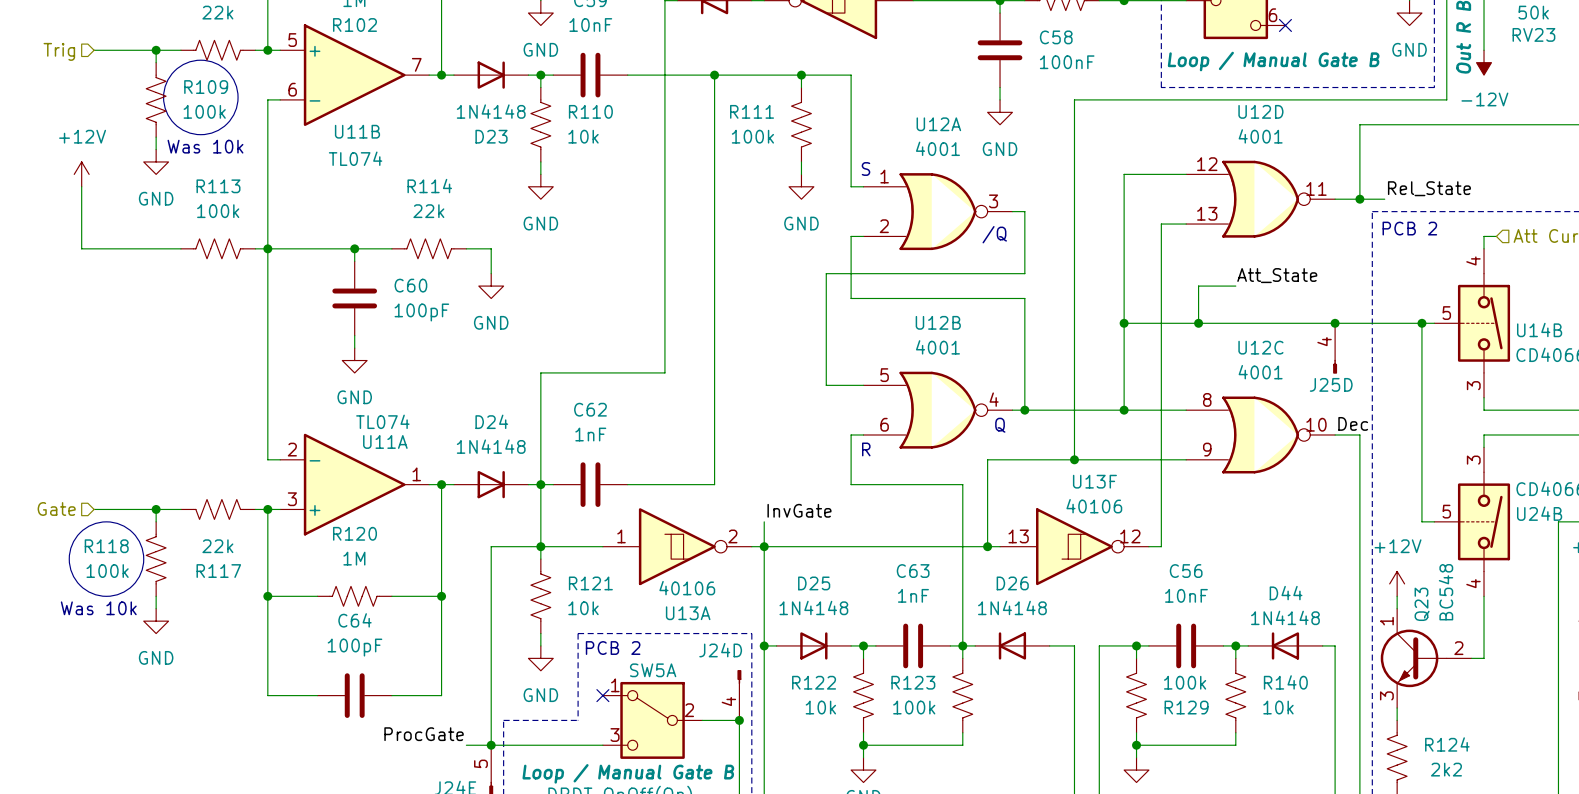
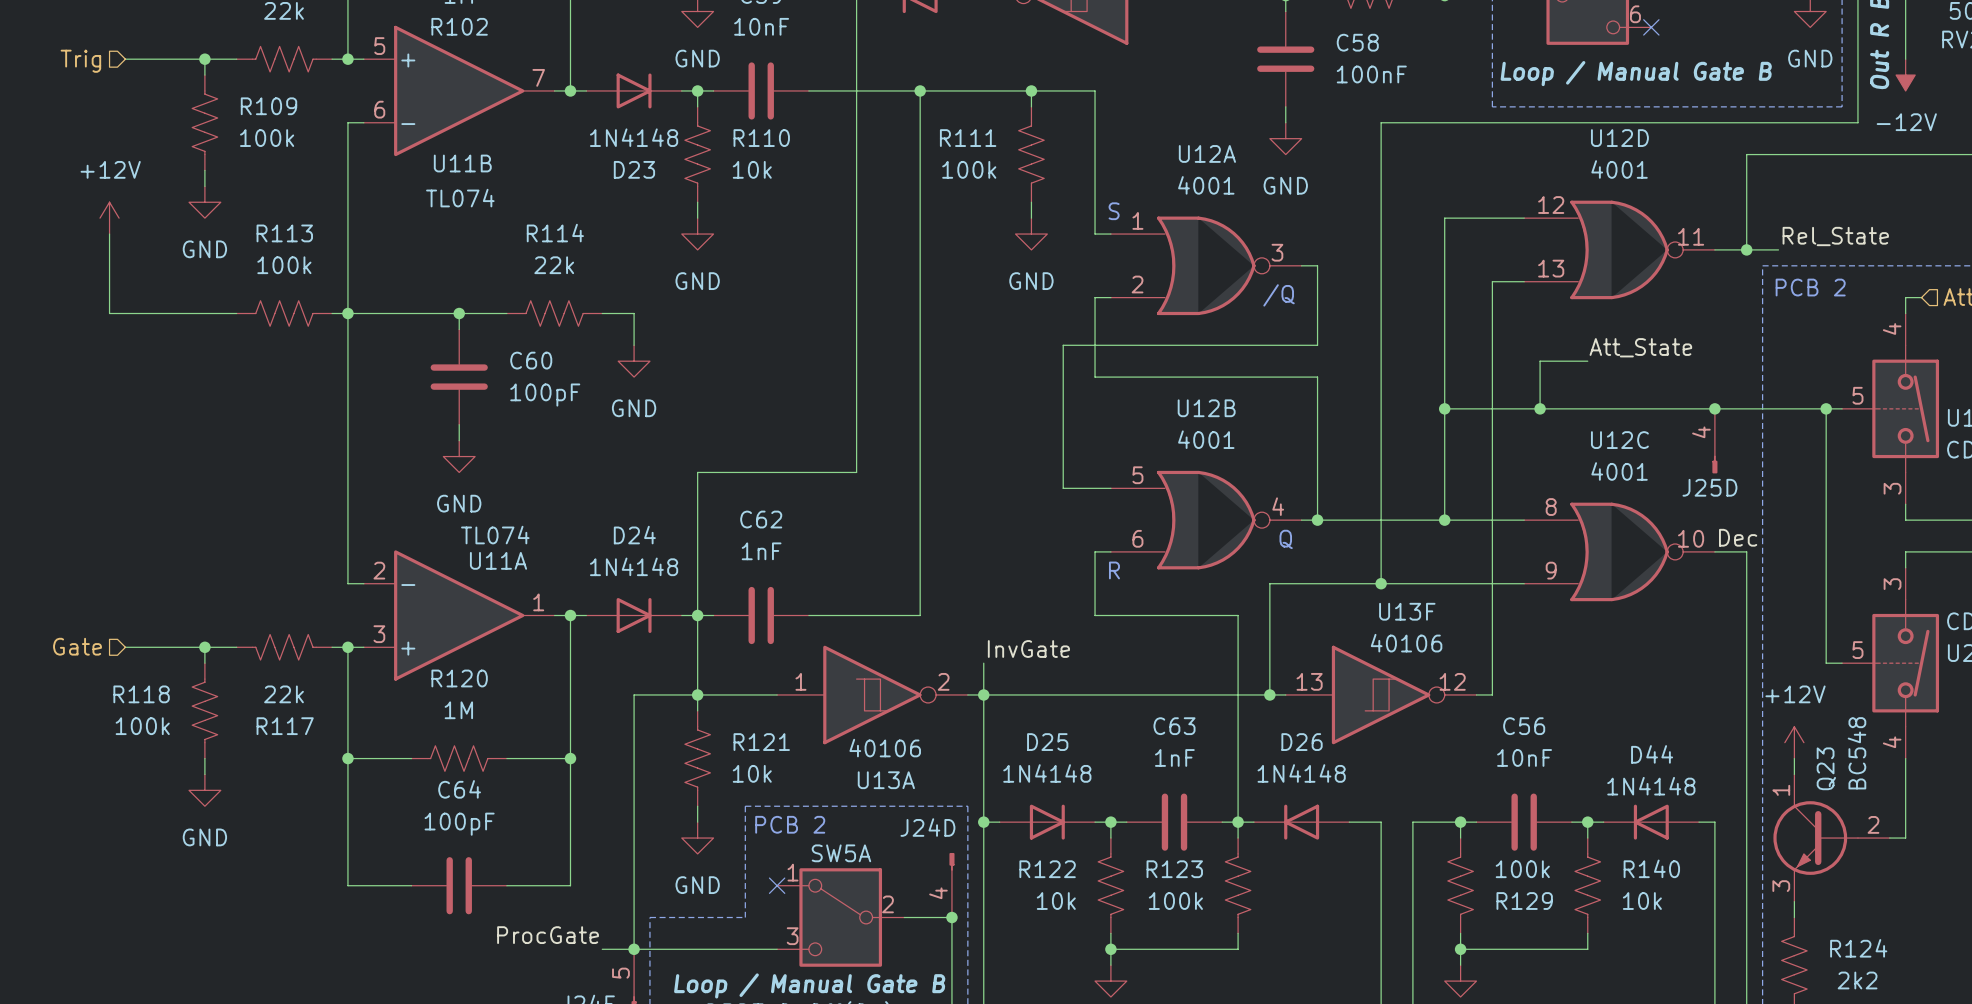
drawing: [163, 60, 239, 135] -> none
text: Was 10k (205, 146) -> none
drawing: [69, 521, 144, 597] -> none
text: Was 10k (98, 608) -> none

